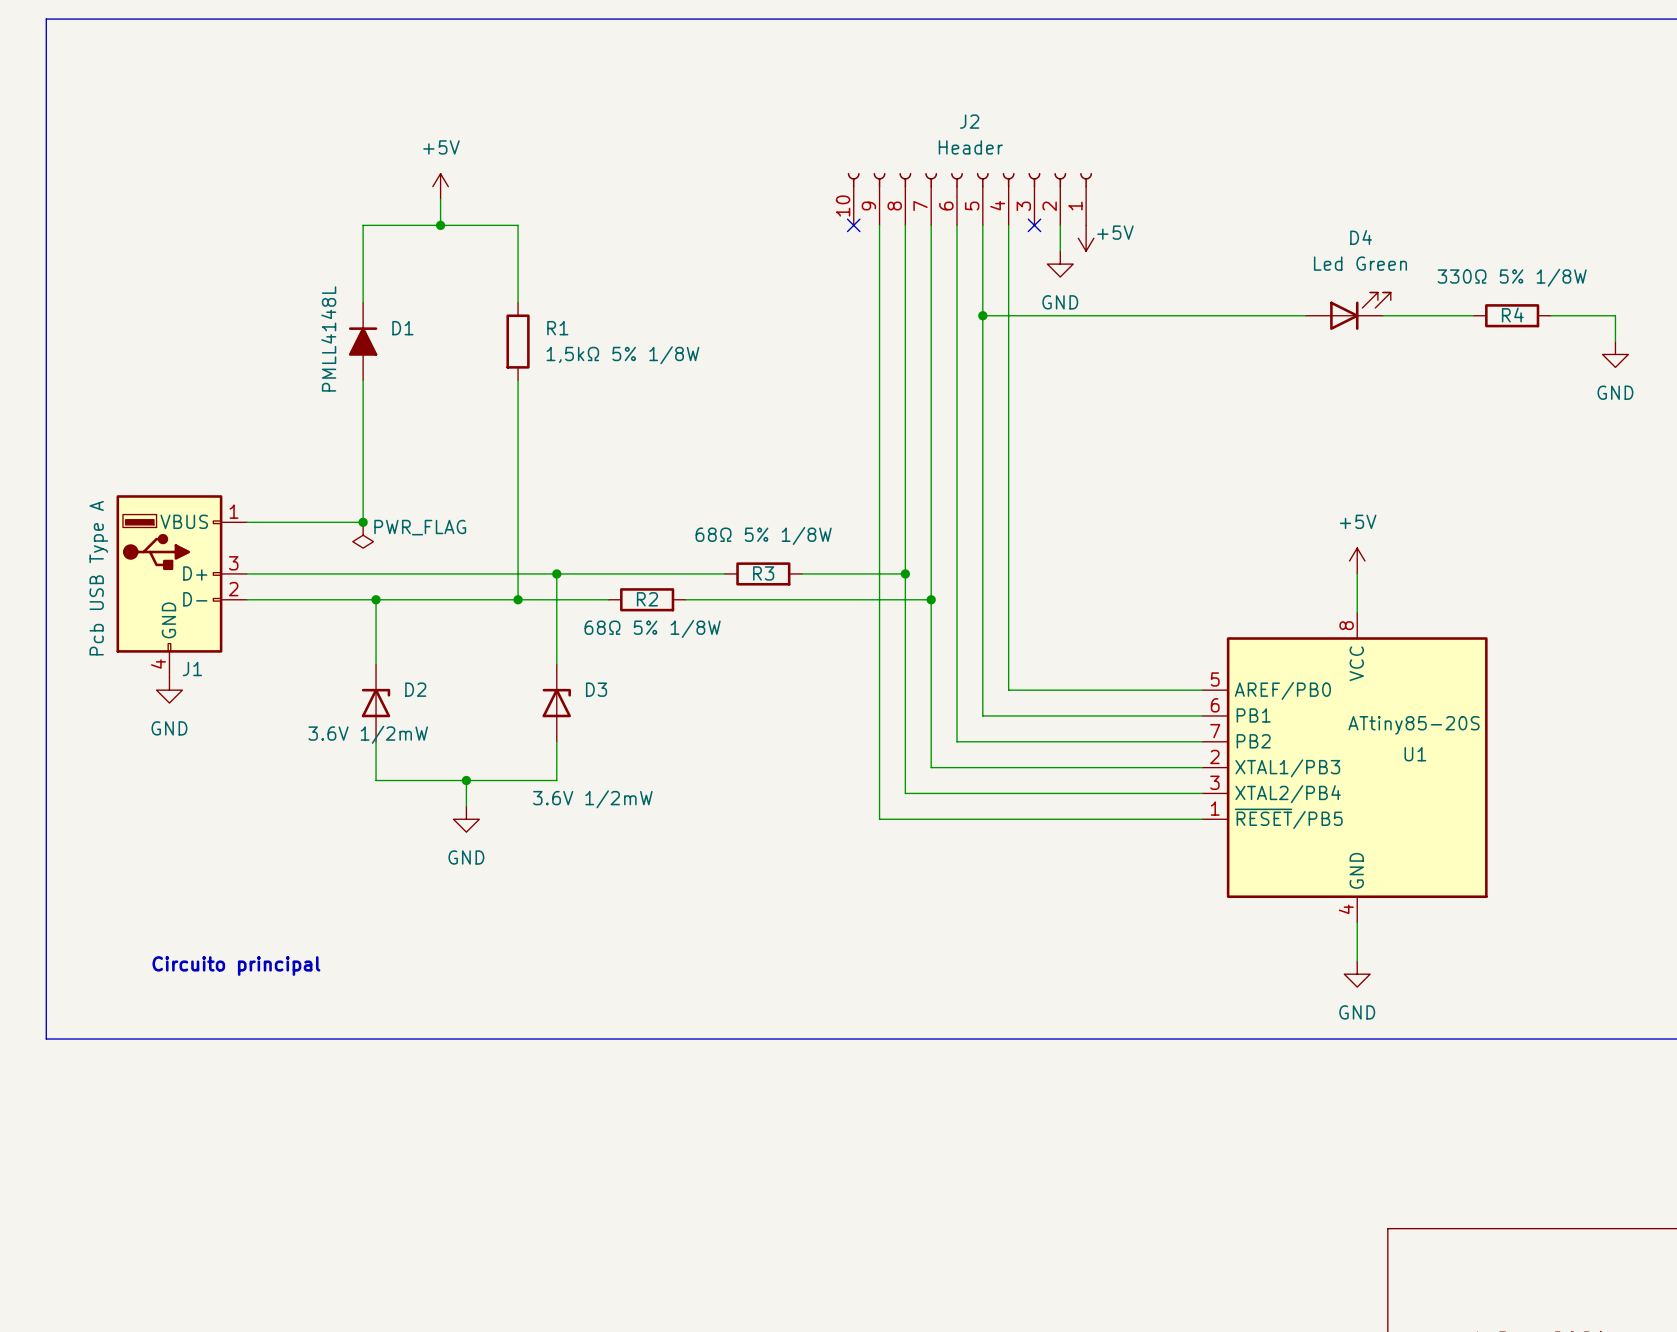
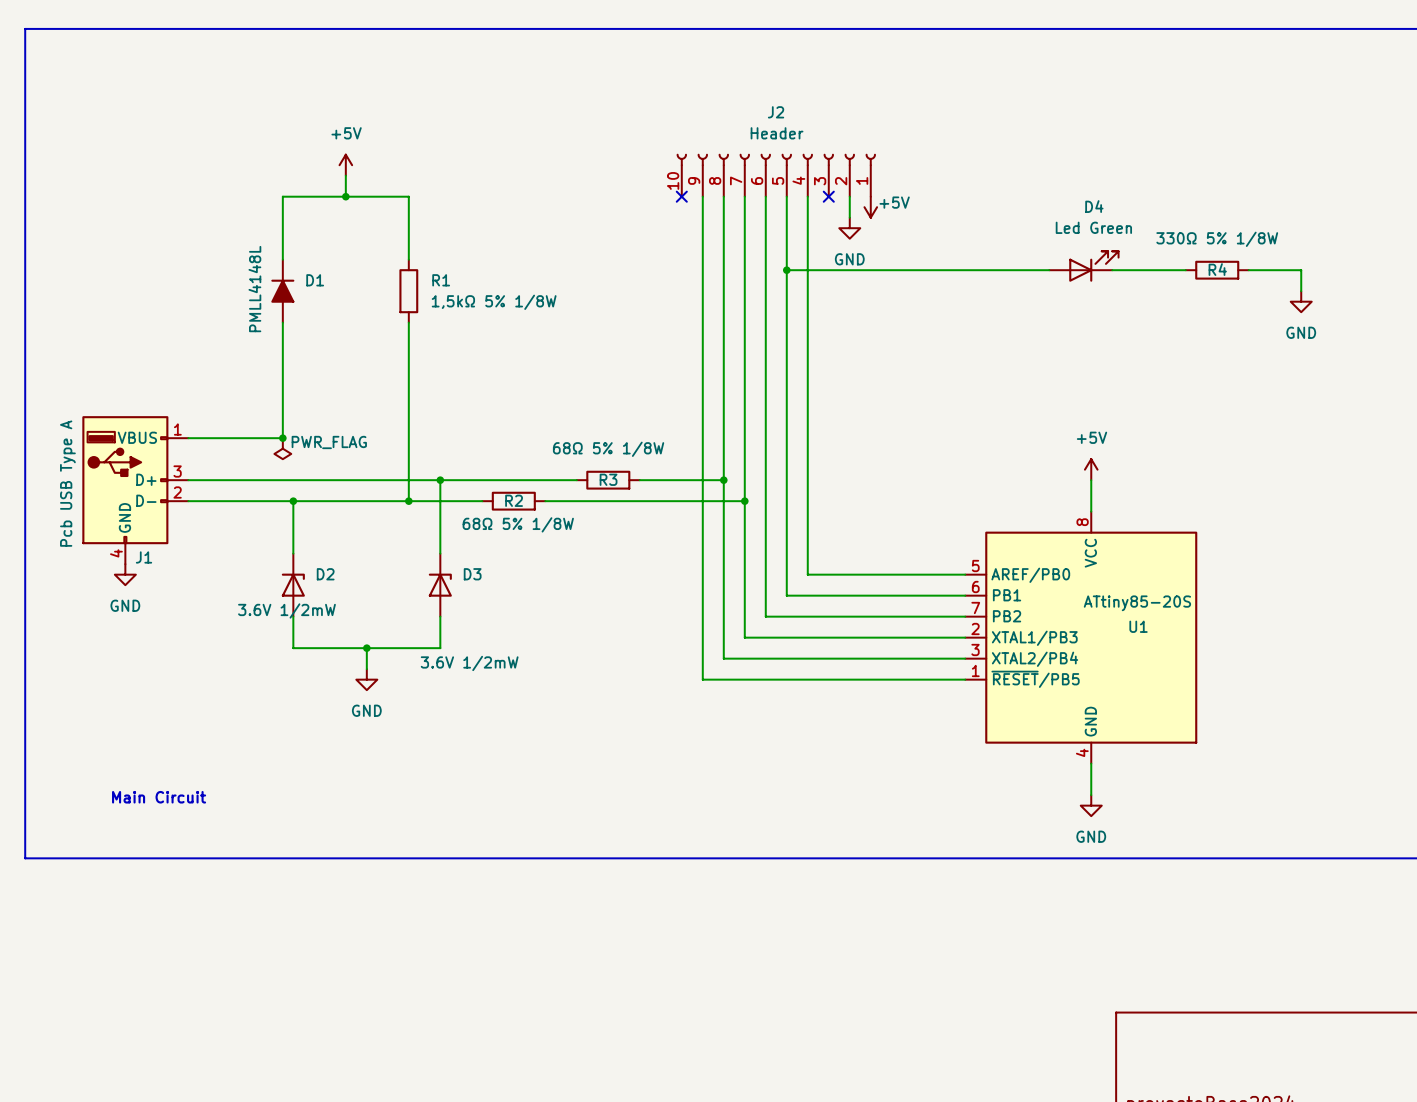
text: Circuito principal (236, 966) -> Main Circuit (159, 797)

